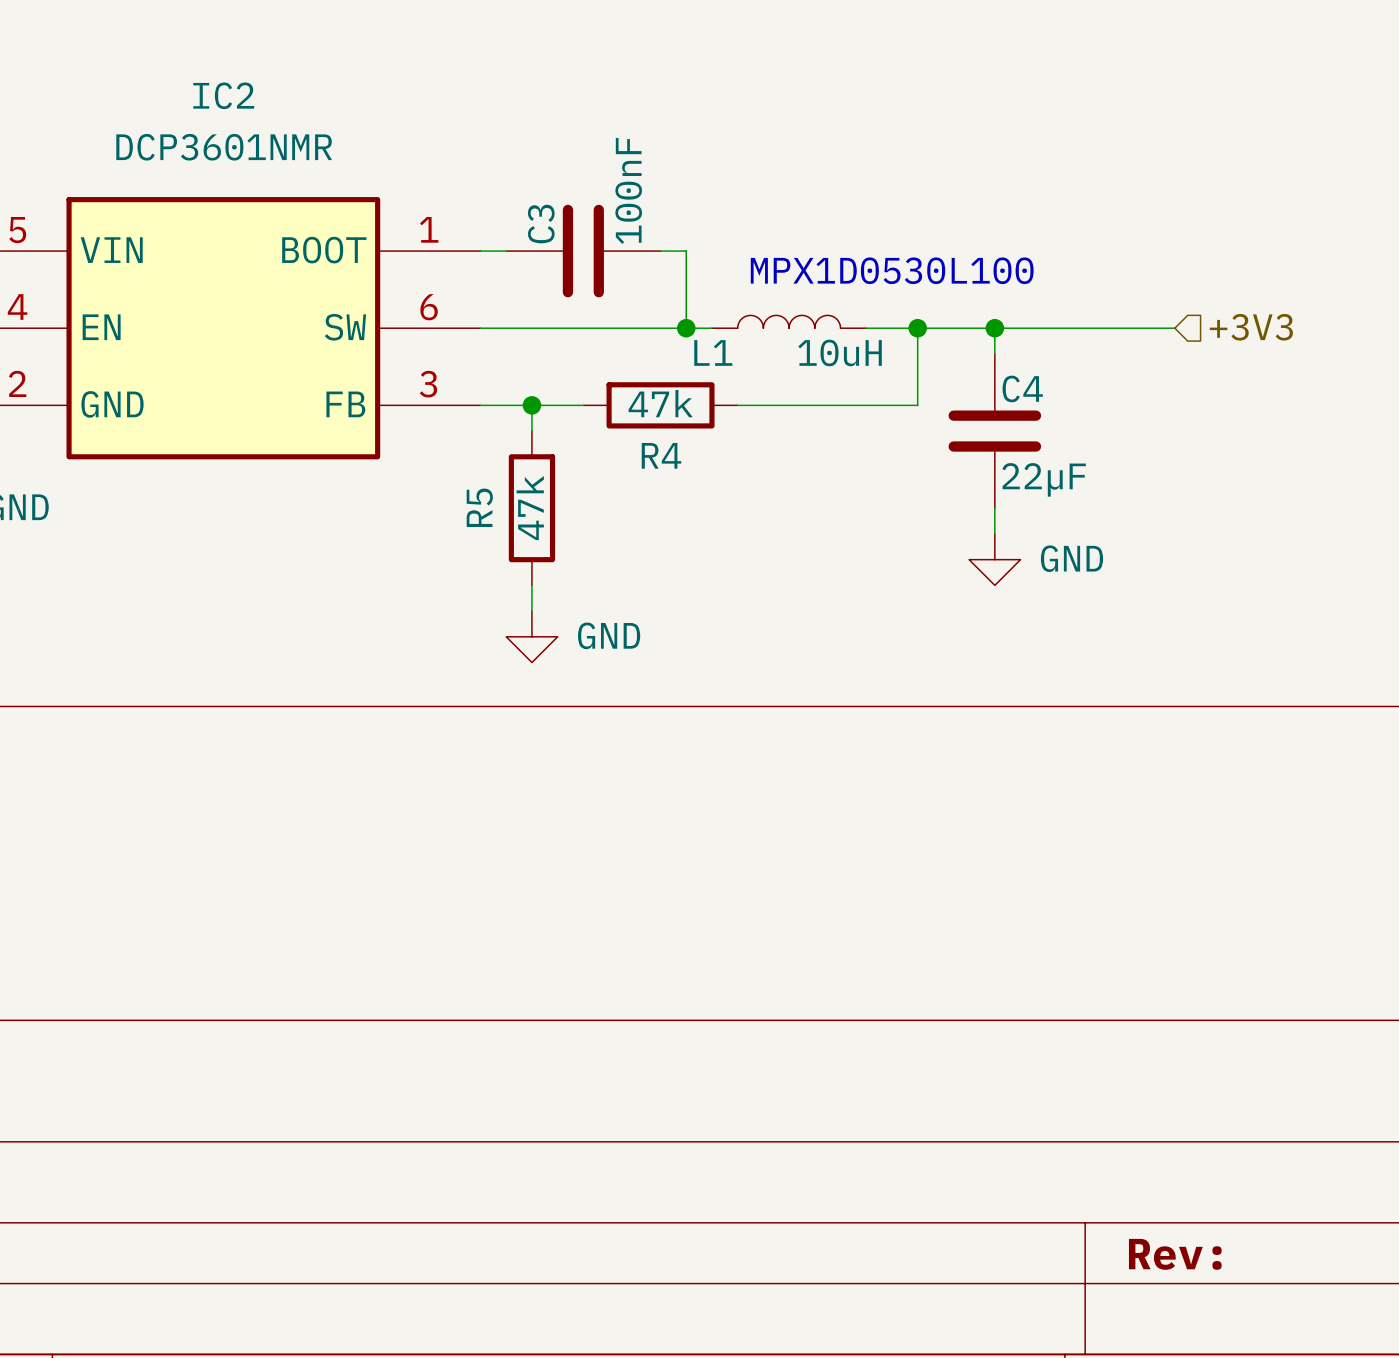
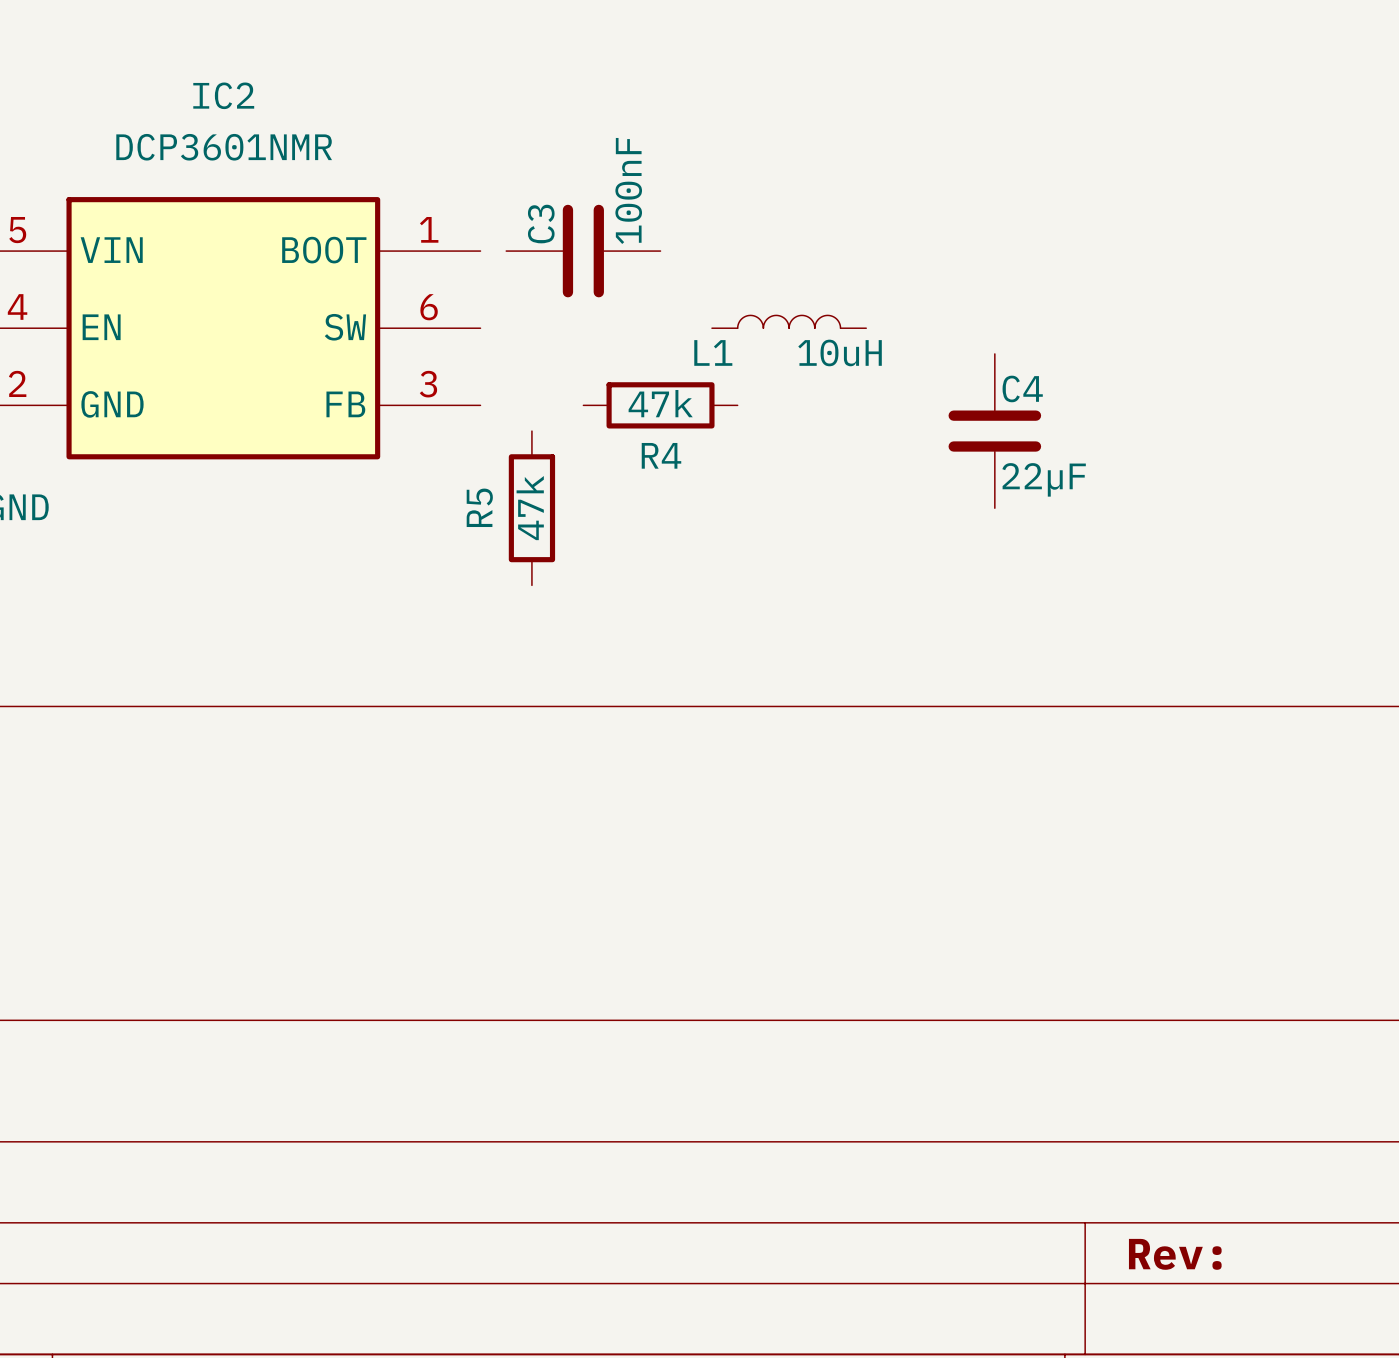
wire: (480, 251) (506, 251) -> none
wire: (660, 251) (686, 251) (686, 328) -> none
text: MPX1D0530L100 (892, 270) -> none
hierarchical label: +3V3 (1251, 327) -> none
wire: (480, 328) (711, 328) -> none
junction: (686, 328) -> none
wire: (866, 328) (1174, 328) -> none
wire: (917, 328) (917, 405) (737, 405) -> none
junction: (917, 328) -> none
wire: (994, 328) (994, 353) -> none
junction: (994, 328) -> none
wire: (480, 405) (583, 405) -> none
wire: (531, 405) (531, 431) -> none
junction: (531, 405) -> none
wire: (994, 508) (994, 533) -> none
power symbol: GND (994, 559) -> none
wire: (531, 585) (531, 611) -> none
power symbol: GND (531, 636) -> none

